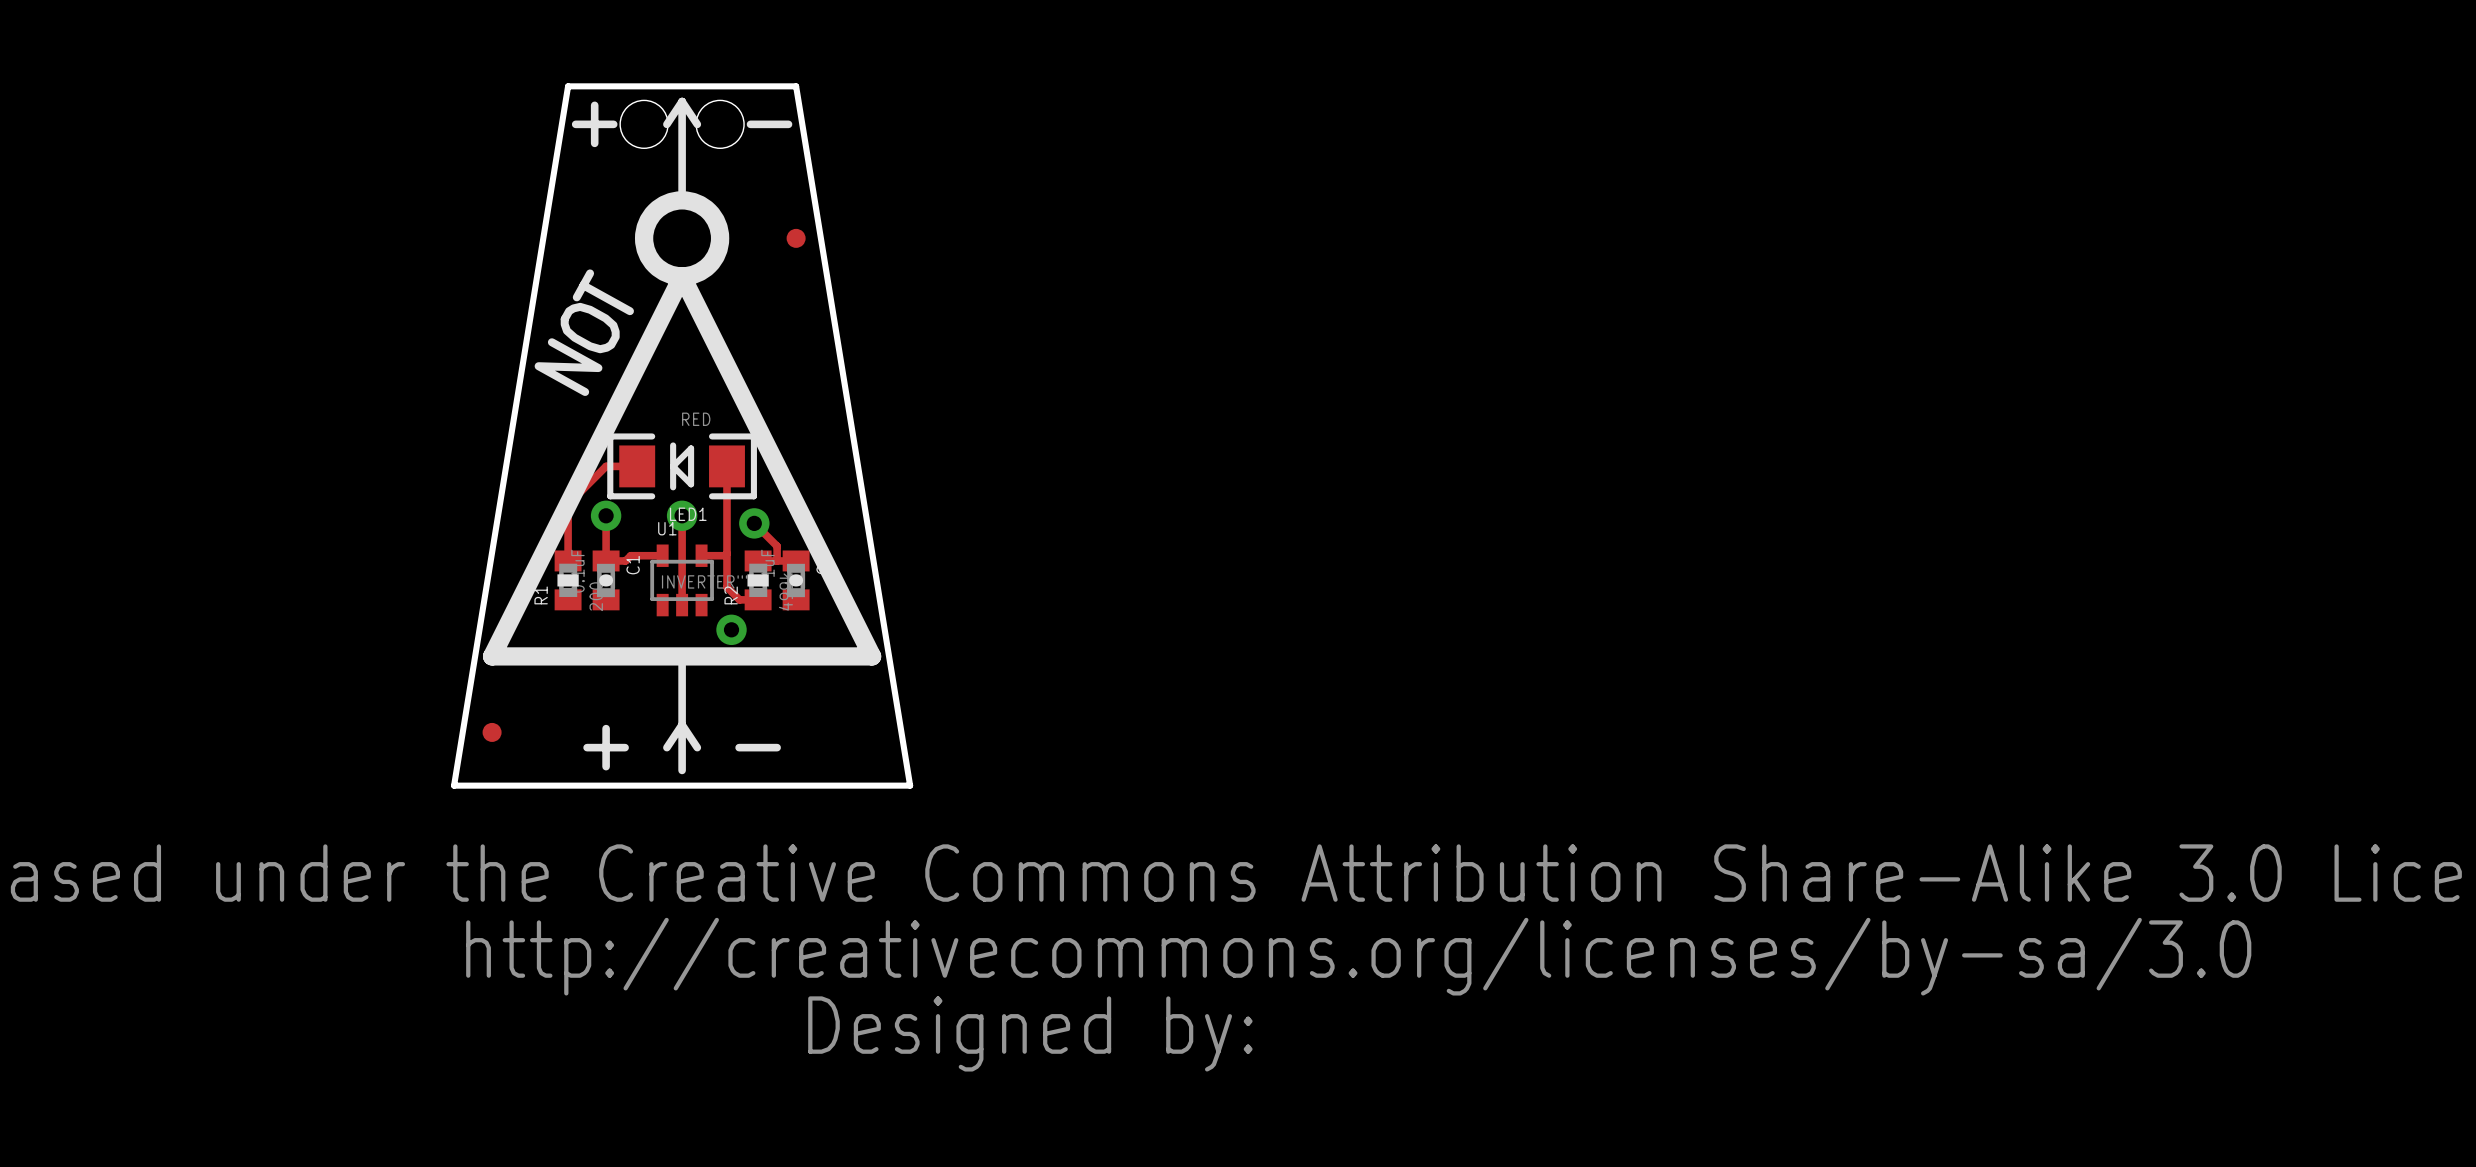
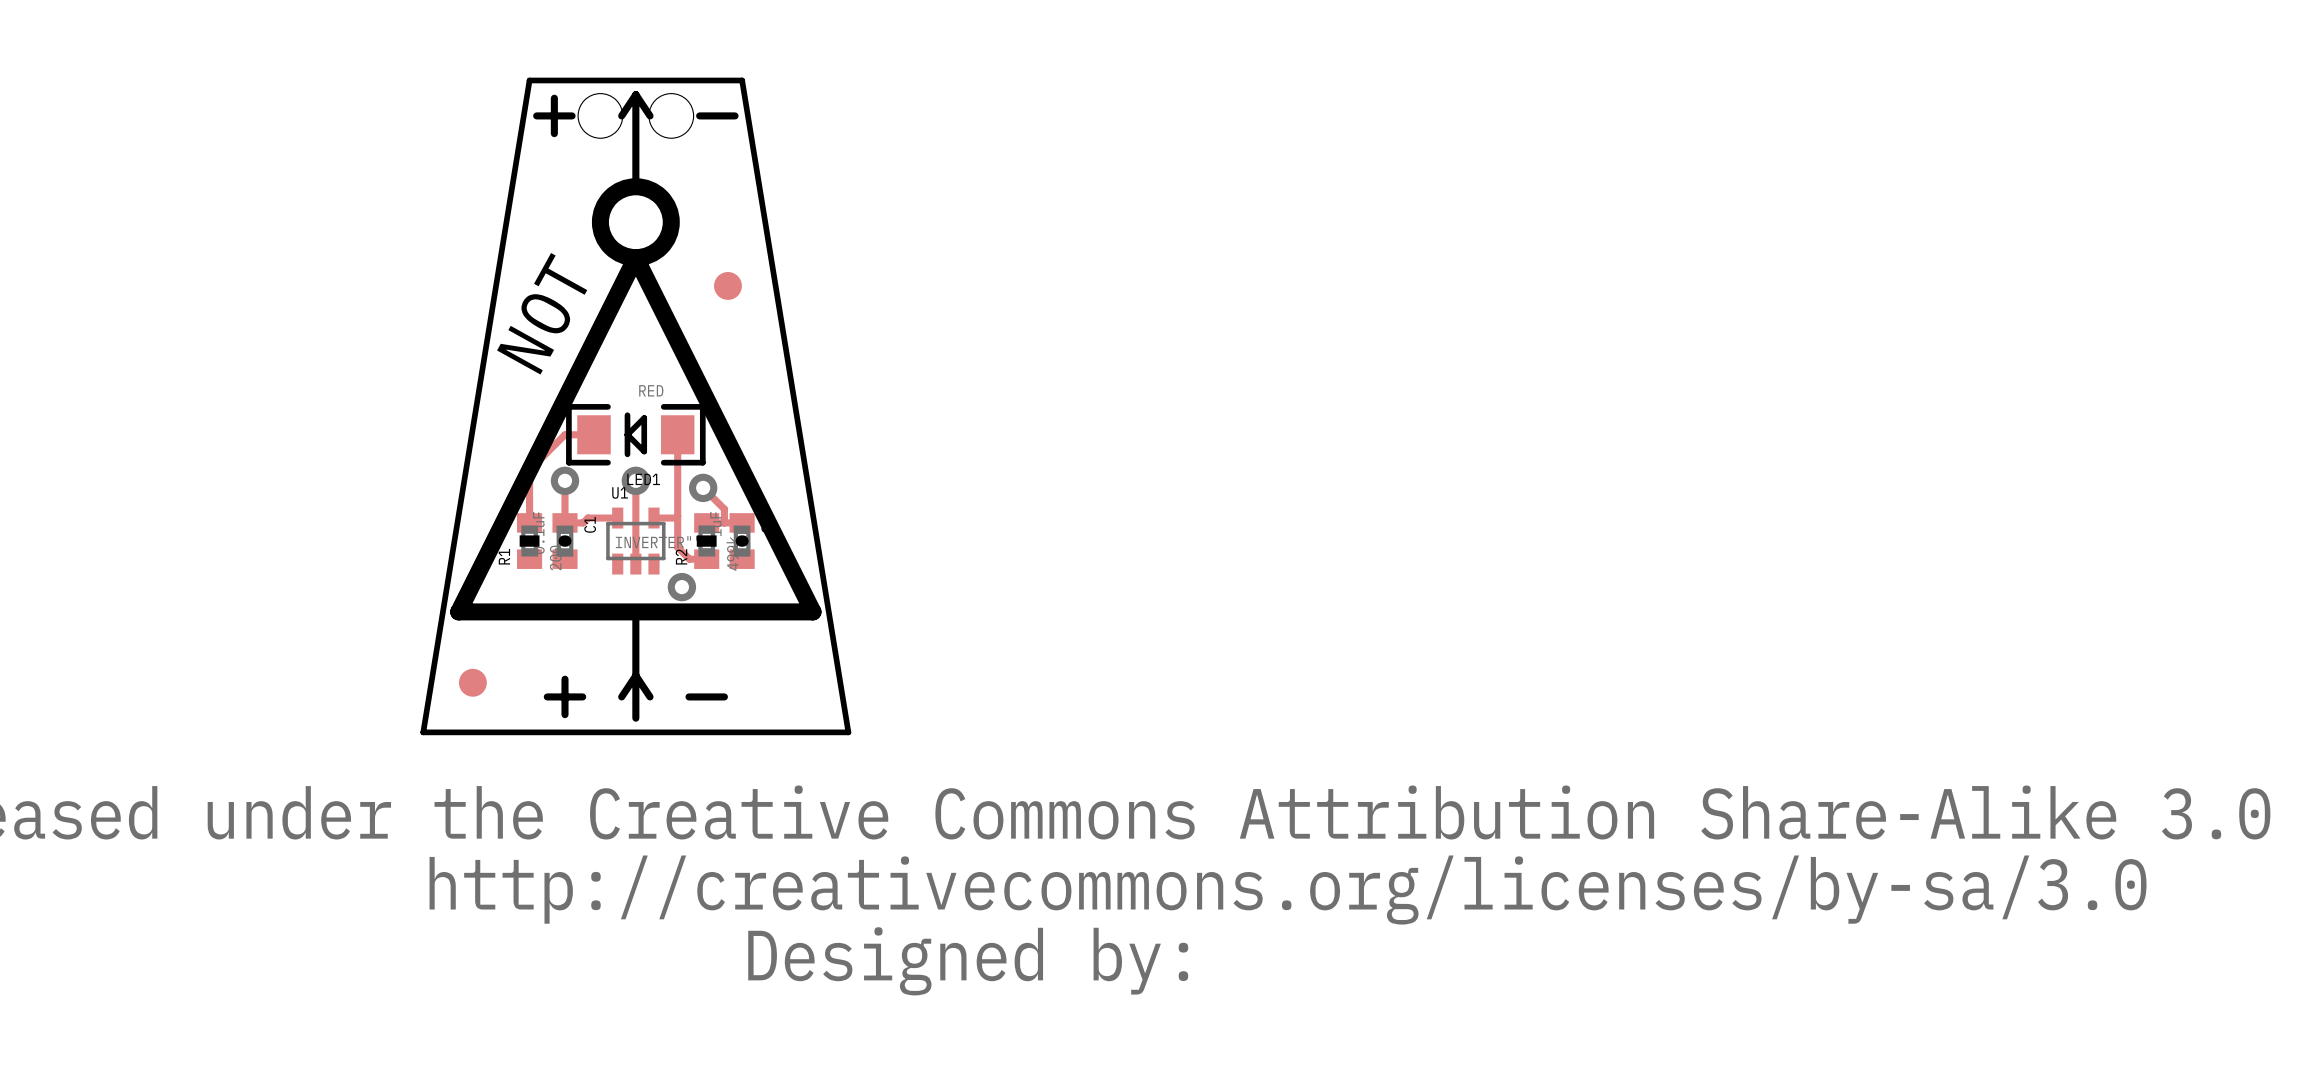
part: (796, 238) -> none
part: none -> (727, 285)
part footprint: [482, 722, 502, 742] -> [458, 668, 487, 697]

